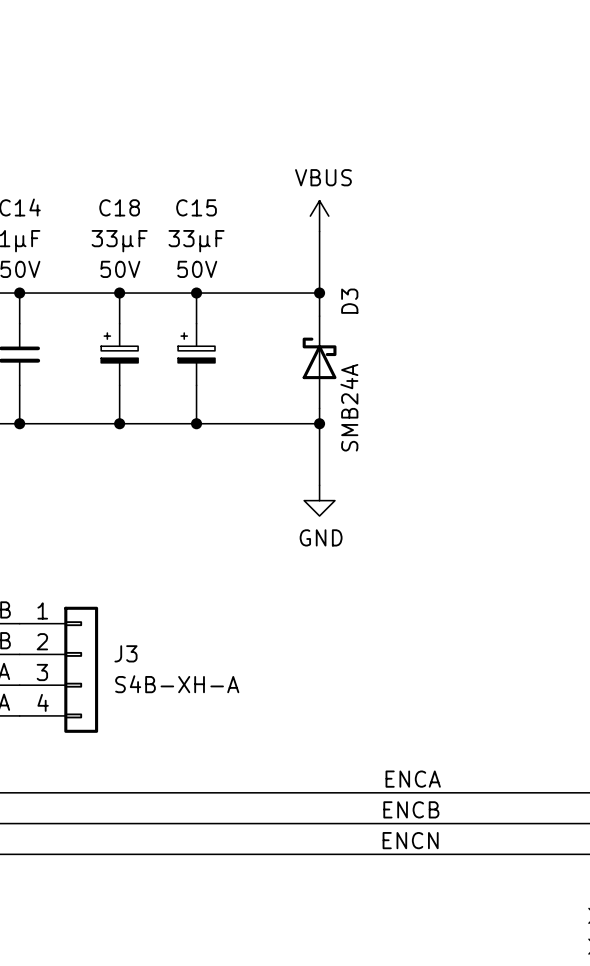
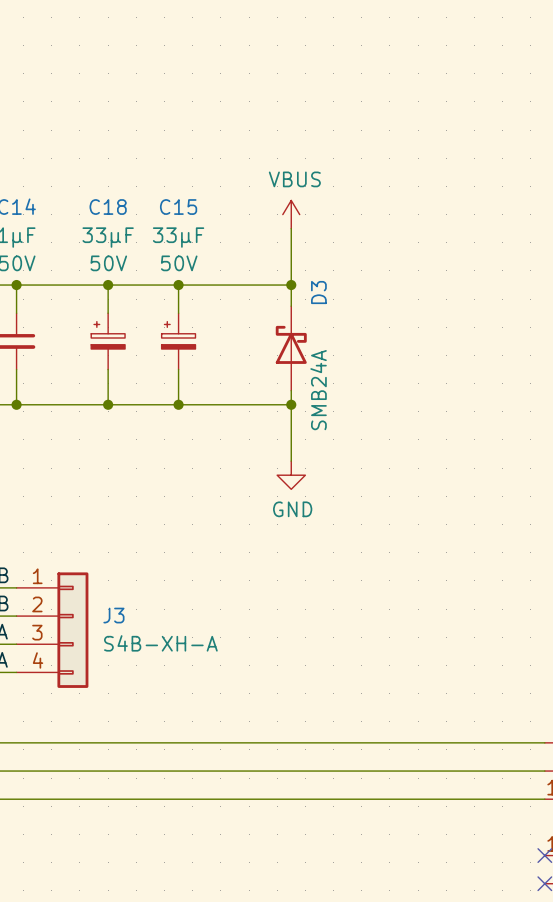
label: ENCA (413, 779) -> none
label: ENCB (411, 809) -> none
label: ENCN (410, 840) -> none

